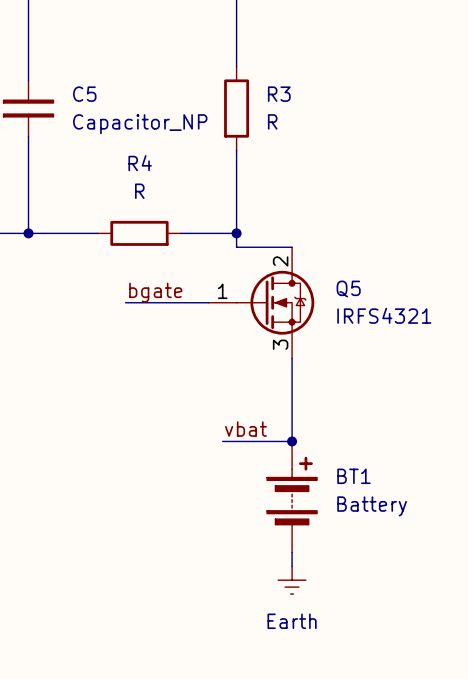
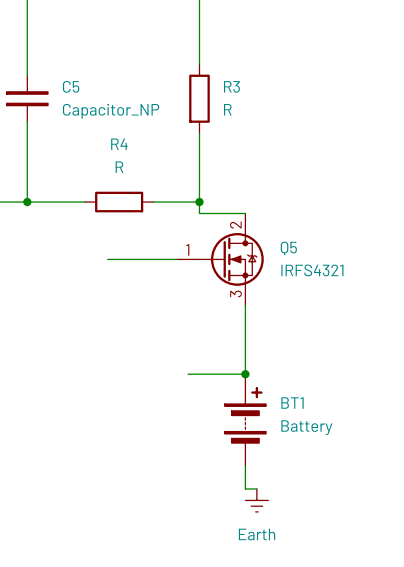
label: bgate (155, 292) -> none
label: vbat (245, 429) -> none
power symbol position: Earth (292, 580) -> Earth (256, 500)

